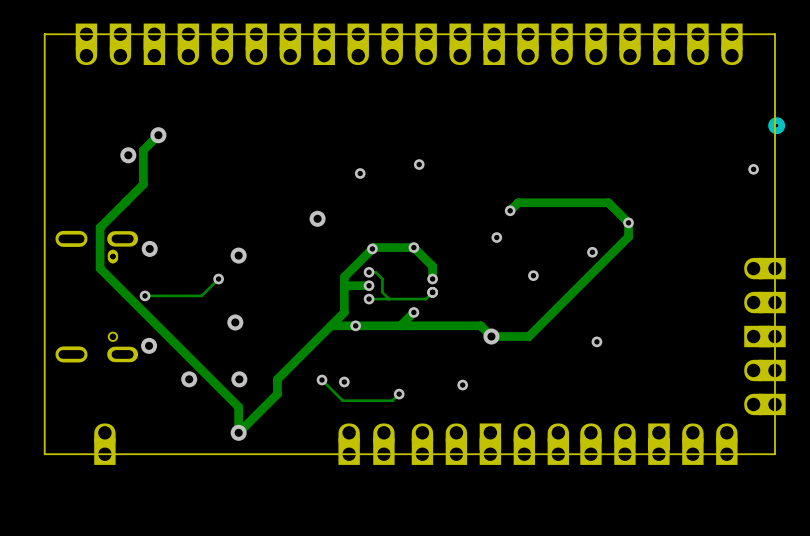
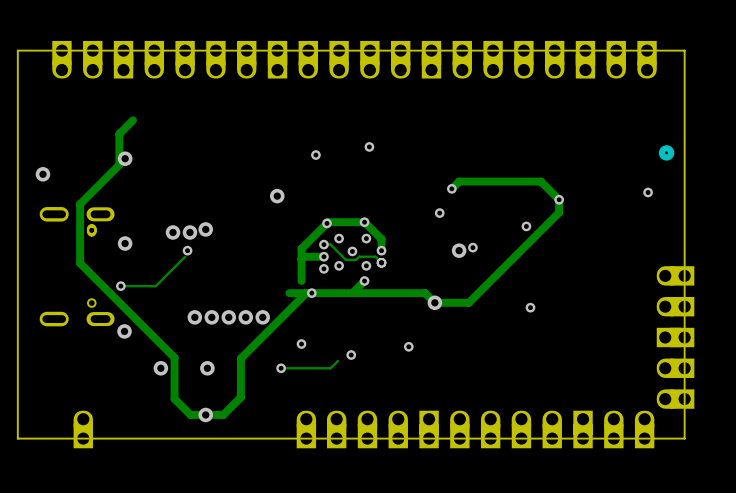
board edge: (774, 34) (44, 34) (44, 454) (774, 454) (774, 34) -> (684, 50) (684, 438) (17, 438) (17, 50) (684, 50)
part position: (409, 44) -> (354, 59)
part position: (776, 125) -> (666, 152)
via: (158, 135) -> none
via: (128, 155) -> none
via position: (753, 169) -> (648, 192)
via: none -> (125, 158)
via: none -> (42, 174)
via position: (149, 248) -> (125, 243)
via: none -> (173, 232)
via: none -> (189, 232)
via: none -> (339, 238)
via: none -> (366, 238)
track: (100, 268) (238, 407) (238, 432) (277, 394) (277, 379) (344, 312) -> (80, 241) (80, 263) (174, 357) (174, 398) (190, 414) (223, 414) (240, 397) (240, 358) (306, 293)
track: (375, 272) (382, 279) (382, 292) (389, 299) -> none
track: (218, 279) (201, 295) (145, 295) -> none
via: none -> (352, 251)
via: none -> (459, 250)
track: none -> (185, 256) (155, 286) (120, 286)
track: (432, 292) (425, 299) (369, 299) -> (381, 262) (375, 256) (359, 256) (355, 259) (345, 259) (330, 244)
via position: (145, 295) -> (120, 286)
via: none -> (339, 265)
via: none -> (366, 265)
via: (235, 322) -> none
part position: (764, 336) -> (675, 337)
via: (149, 345) -> none
via: none -> (194, 317)
via: none -> (211, 317)
via: none -> (228, 317)
via: none -> (245, 317)
via: none -> (262, 317)
via: none -> (124, 331)
via: (189, 379) -> none
via: (239, 379) -> none
track: (322, 380) (342, 400) (392, 400) (399, 394) -> none
via position: (322, 380) -> (281, 368)
track: none -> (337, 361) (330, 368) (281, 368)
via: none -> (160, 368)
via: none -> (207, 368)
via: (238, 432) -> none
part position: (104, 444) -> (83, 429)
part: (349, 444) -> none
part: (383, 444) -> none
part position: (490, 444) -> (429, 429)
part position: (658, 444) -> (583, 429)
via: none -> (205, 414)
part: none -> (306, 429)
part: none -> (336, 429)

